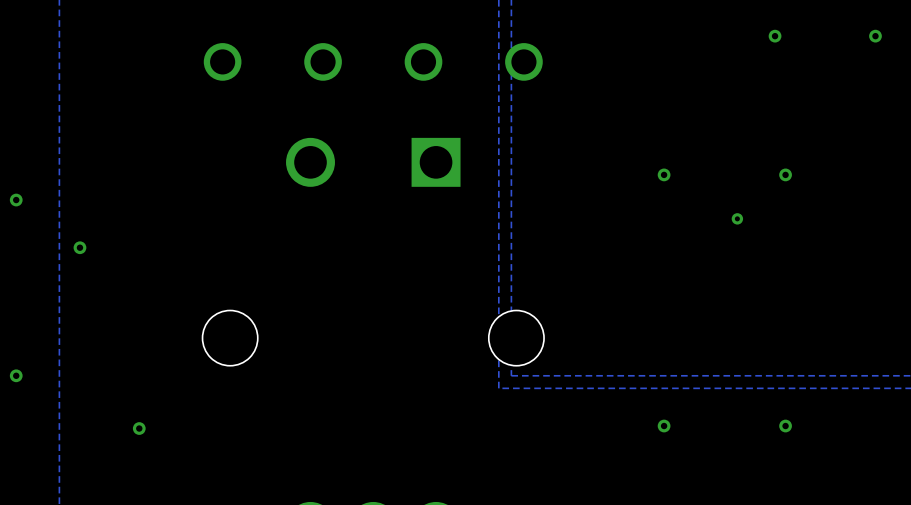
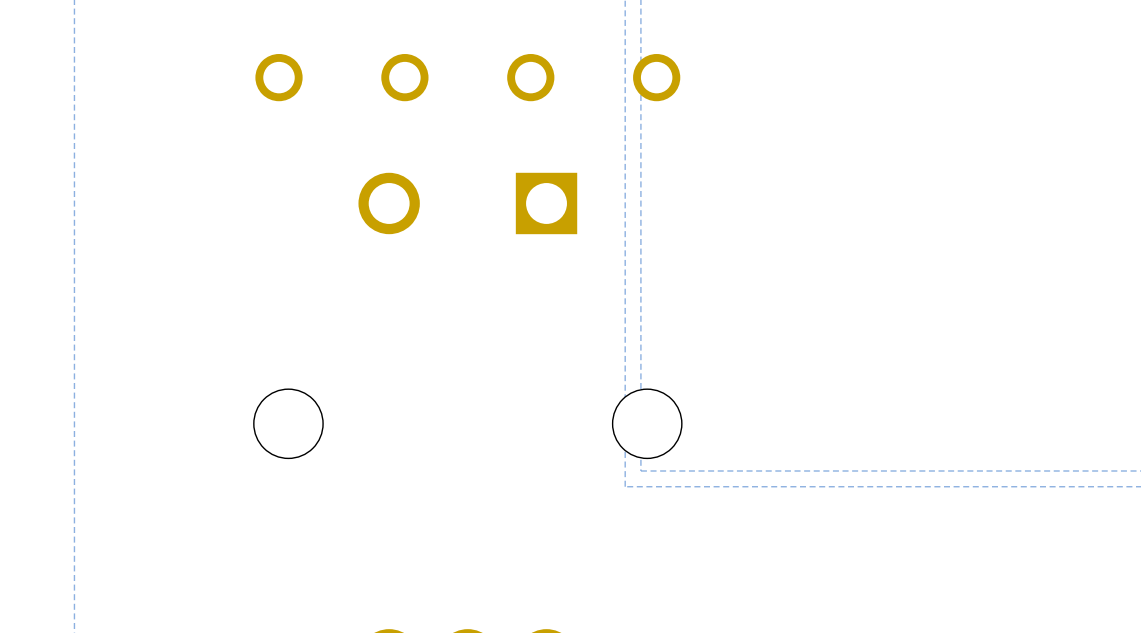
via: (775, 36) -> none
via: (875, 36) -> none
via: (664, 174) -> none
via: (785, 174) -> none
via: (16, 200) -> none
via: (737, 218) -> none
via: (79, 247) -> none
via: (16, 375) -> none
via: (664, 426) -> none
via: (785, 426) -> none
via: (139, 428) -> none

